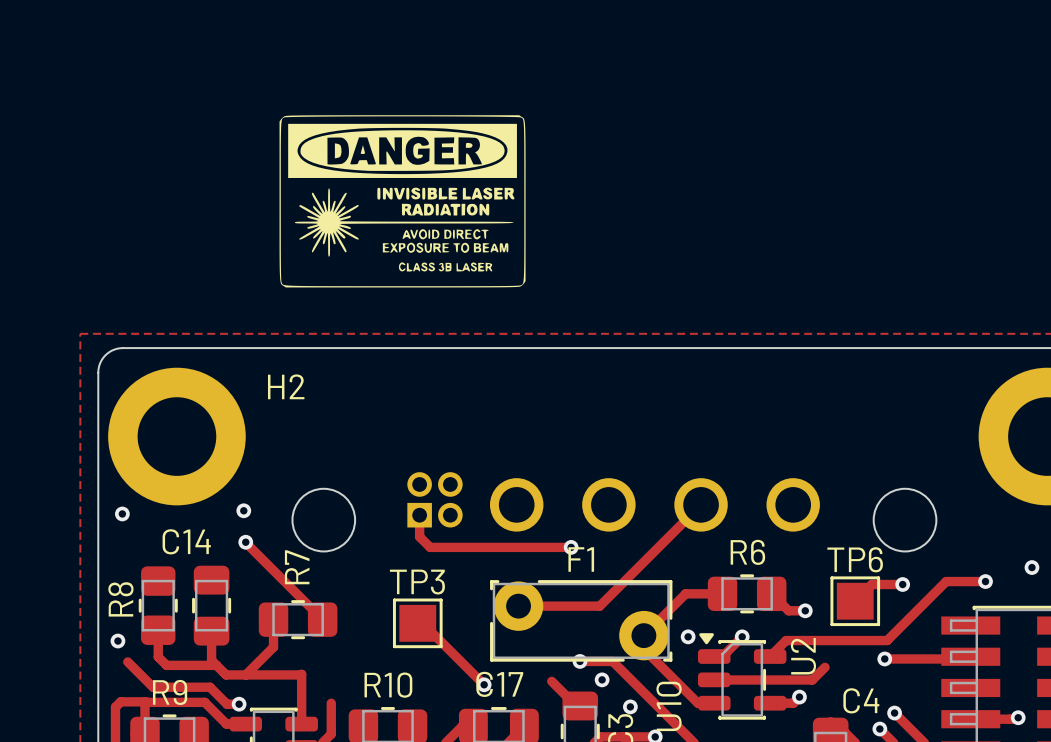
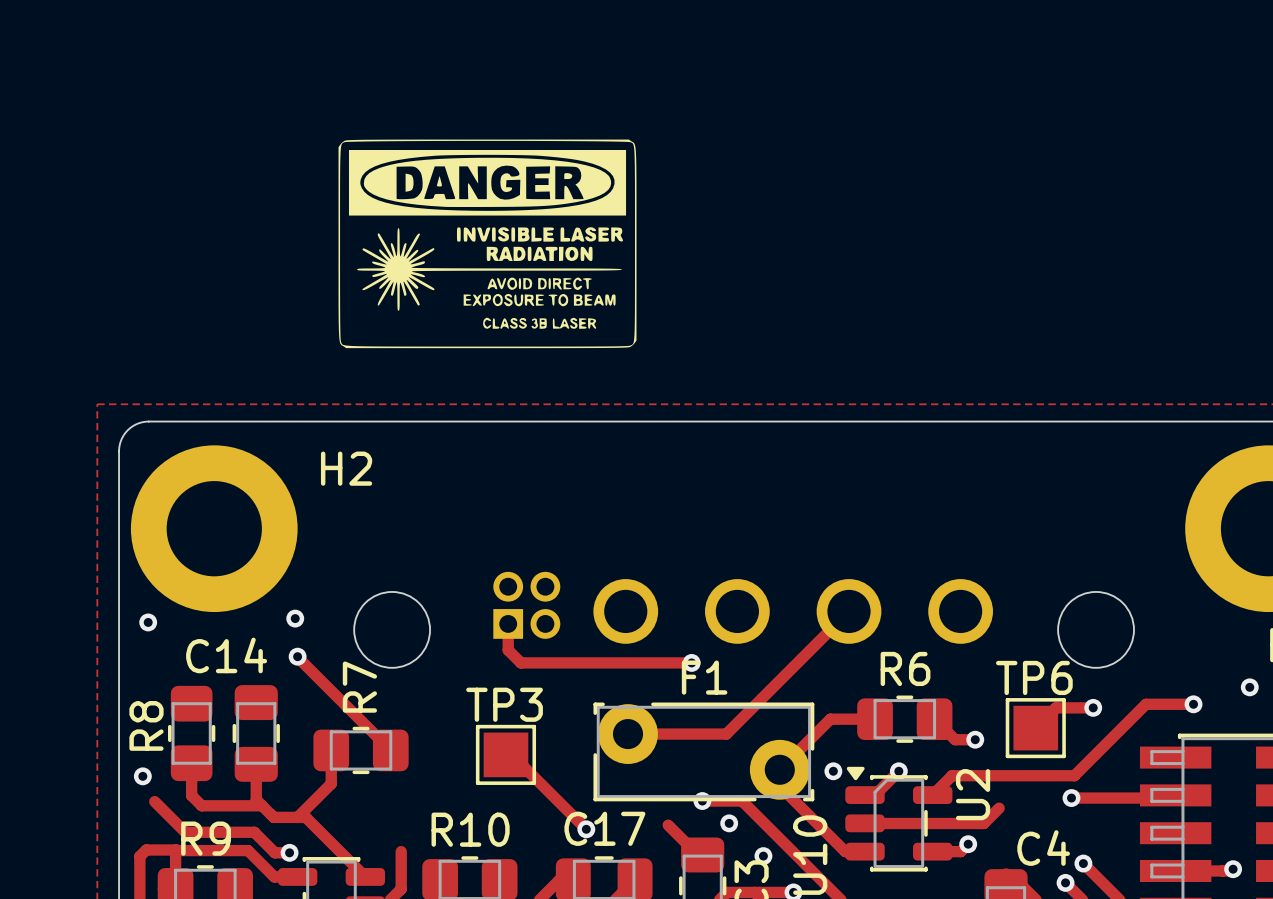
track: (252, 674) (301, 674) (301, 724) -> (305, 817) (365, 876)

